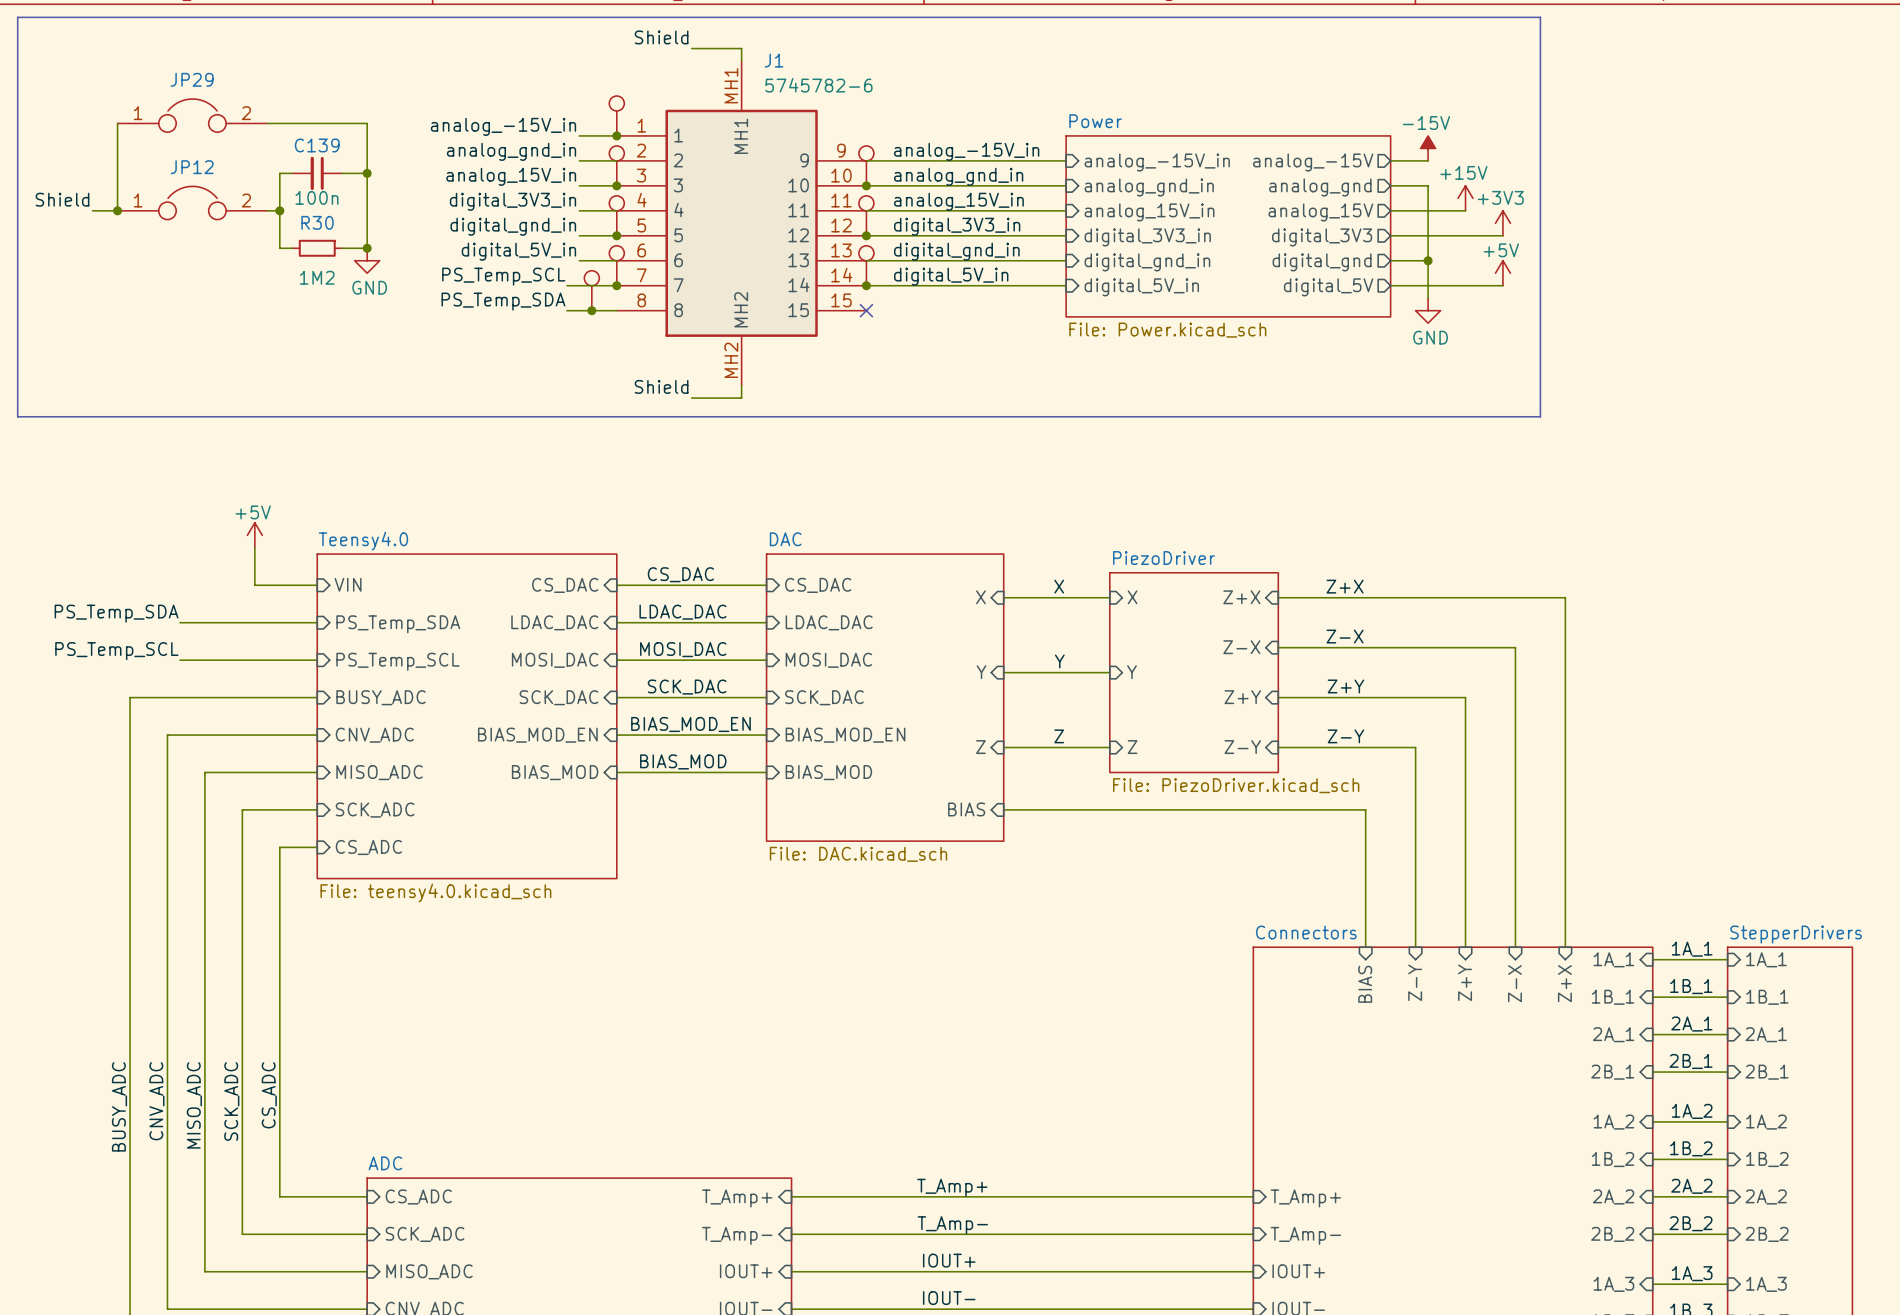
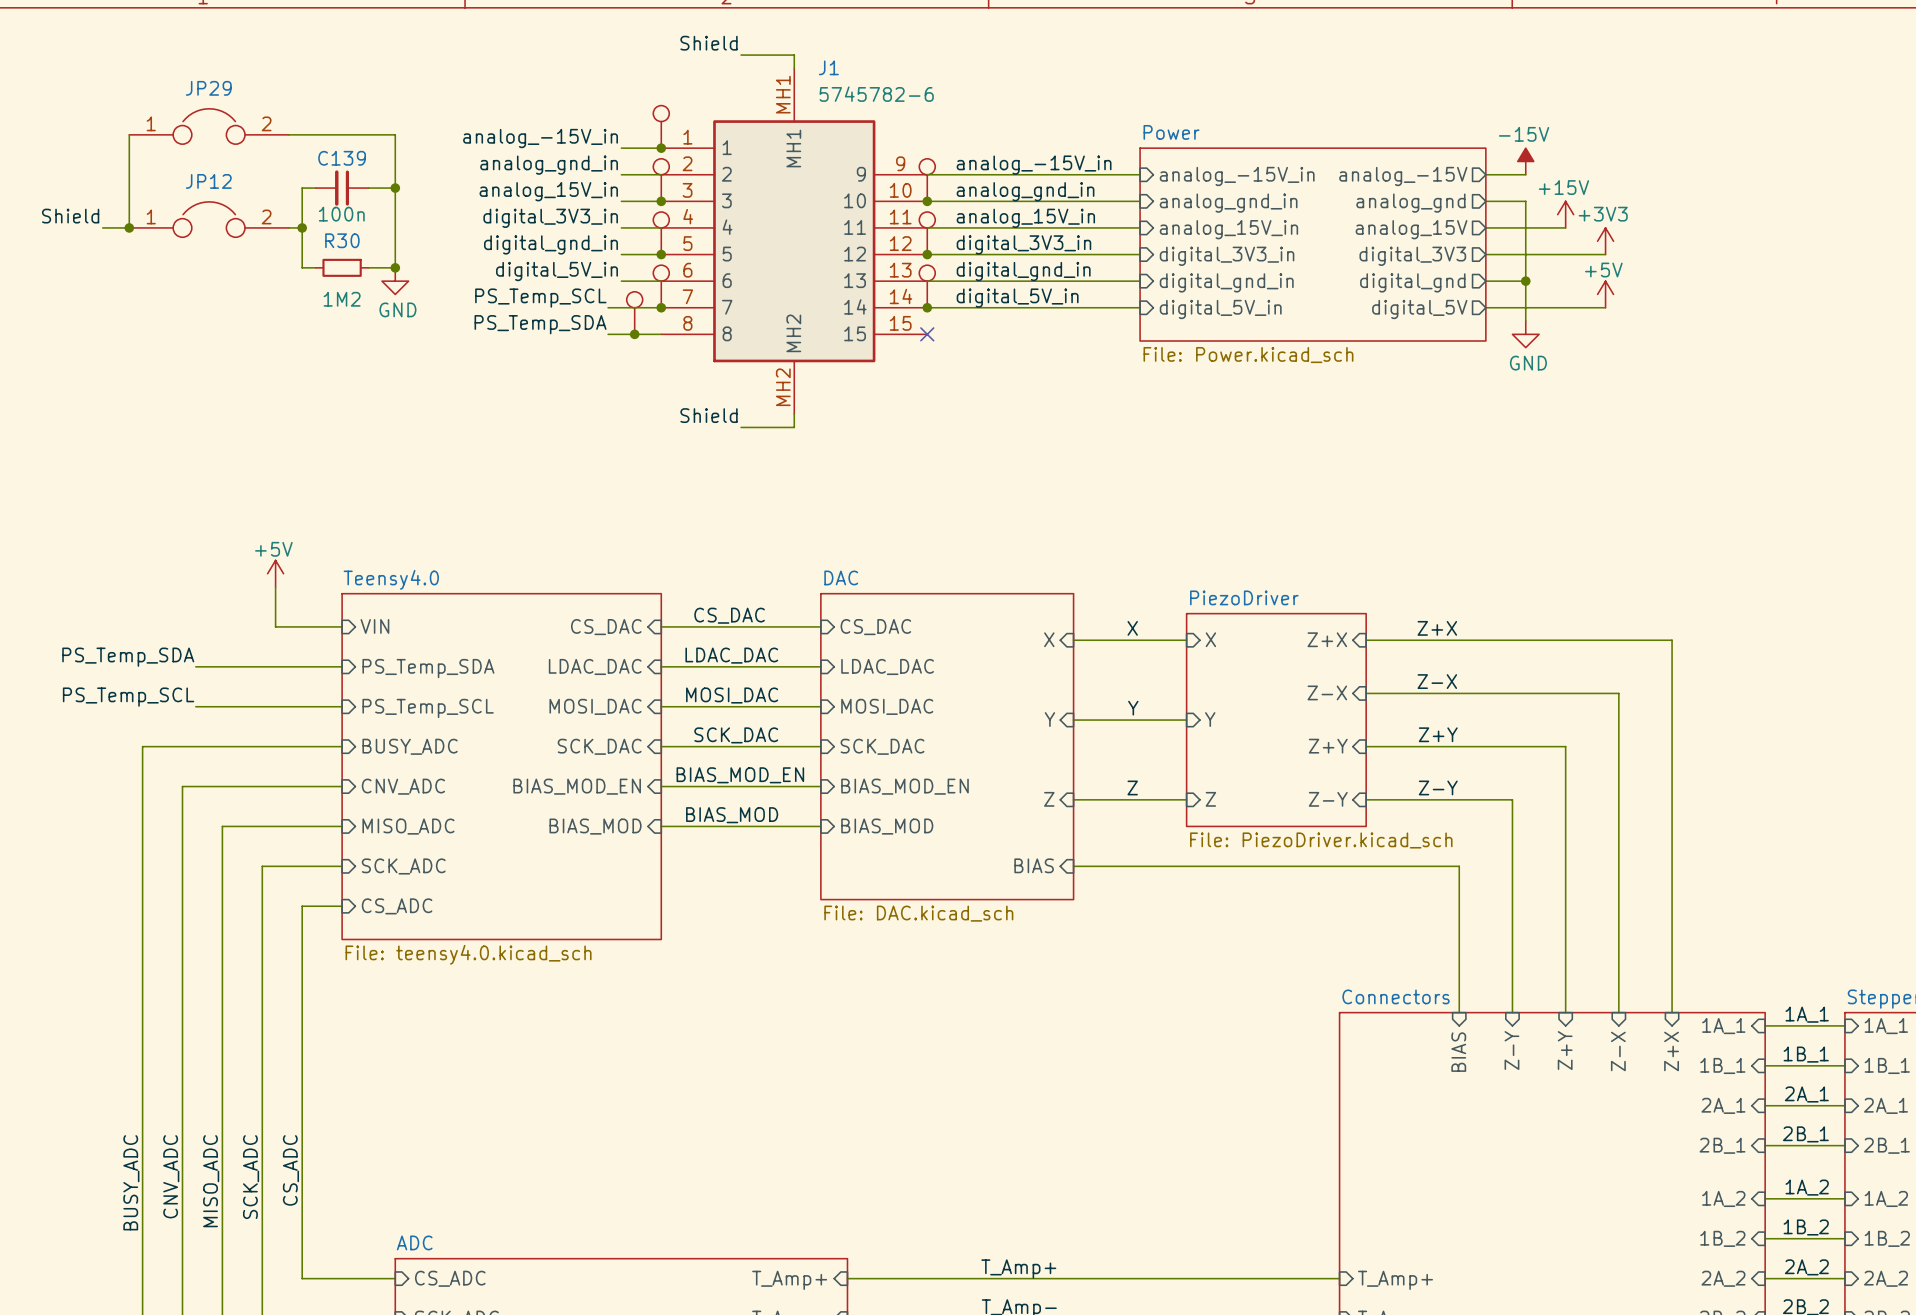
line: (17, 17) (1540, 17) (1540, 416) (17, 416) (17, 17) -> none

